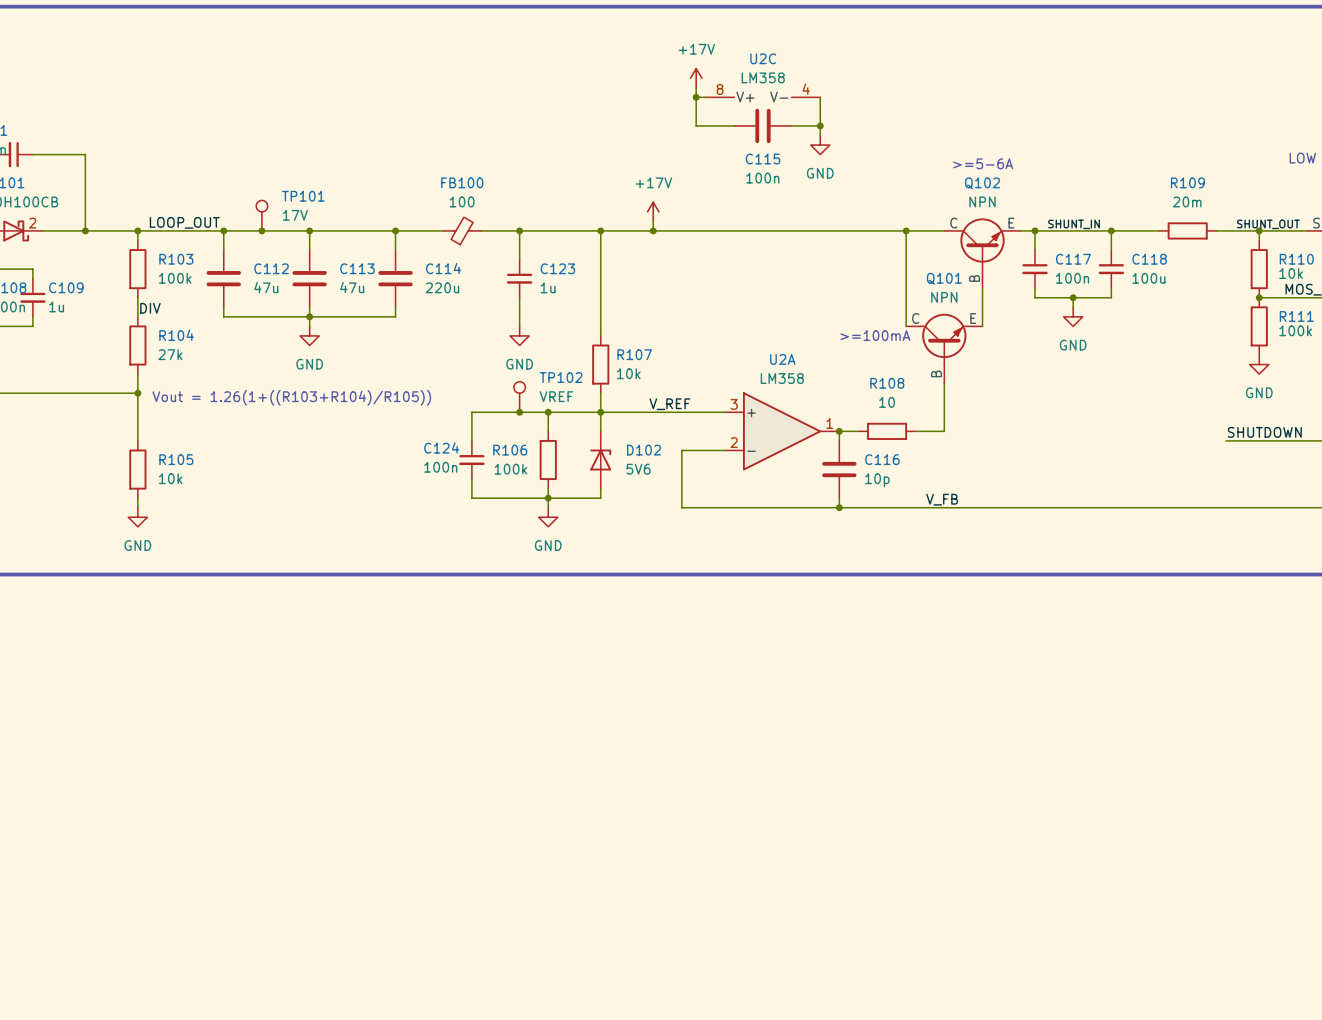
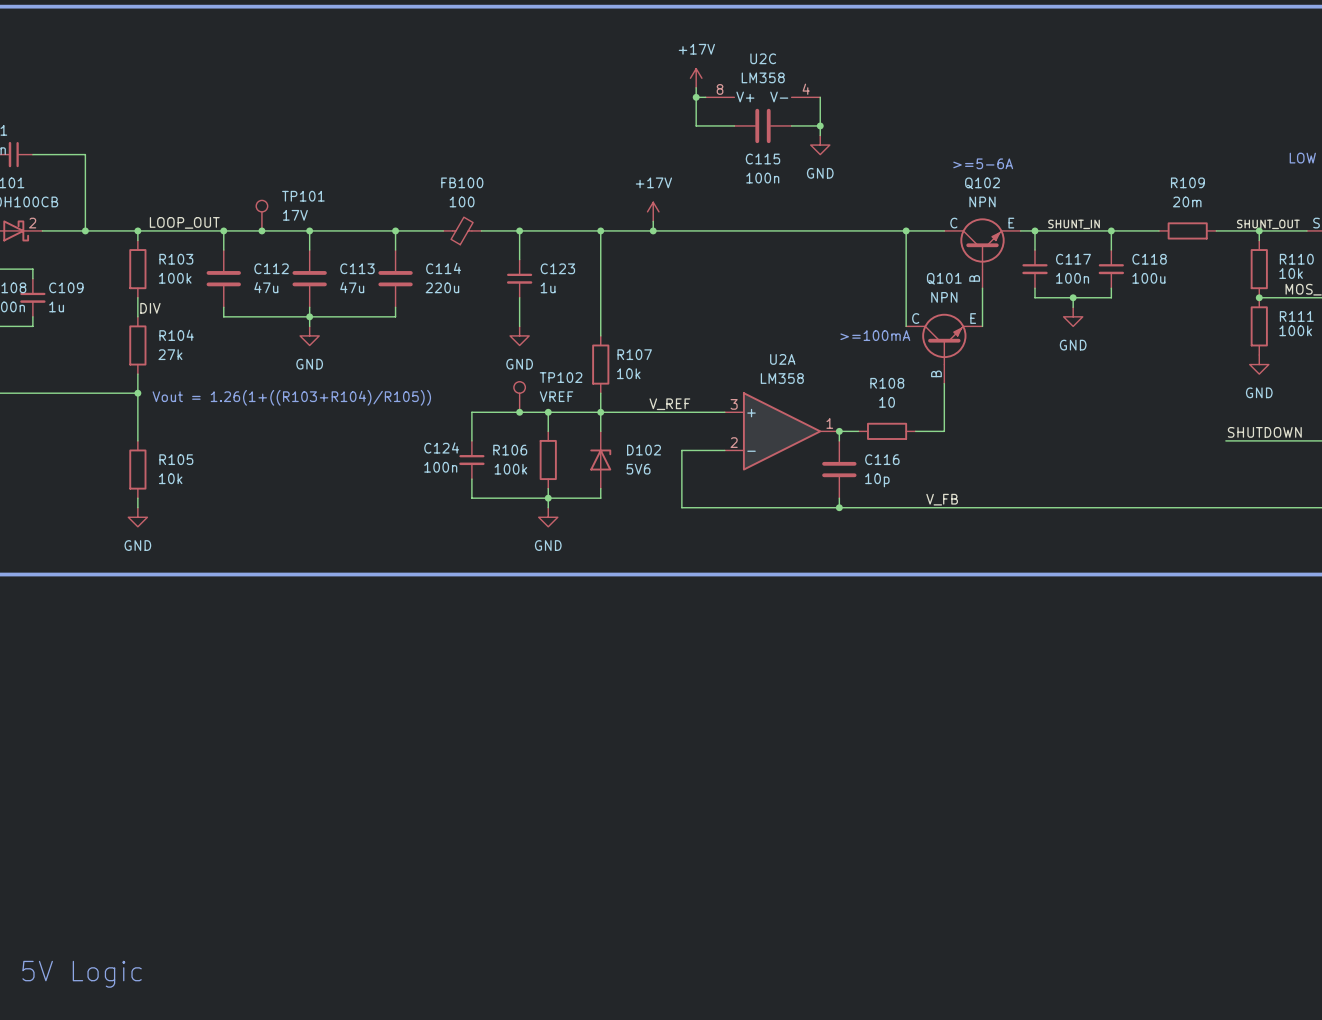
text: none -> 5V Logic (82, 974)

